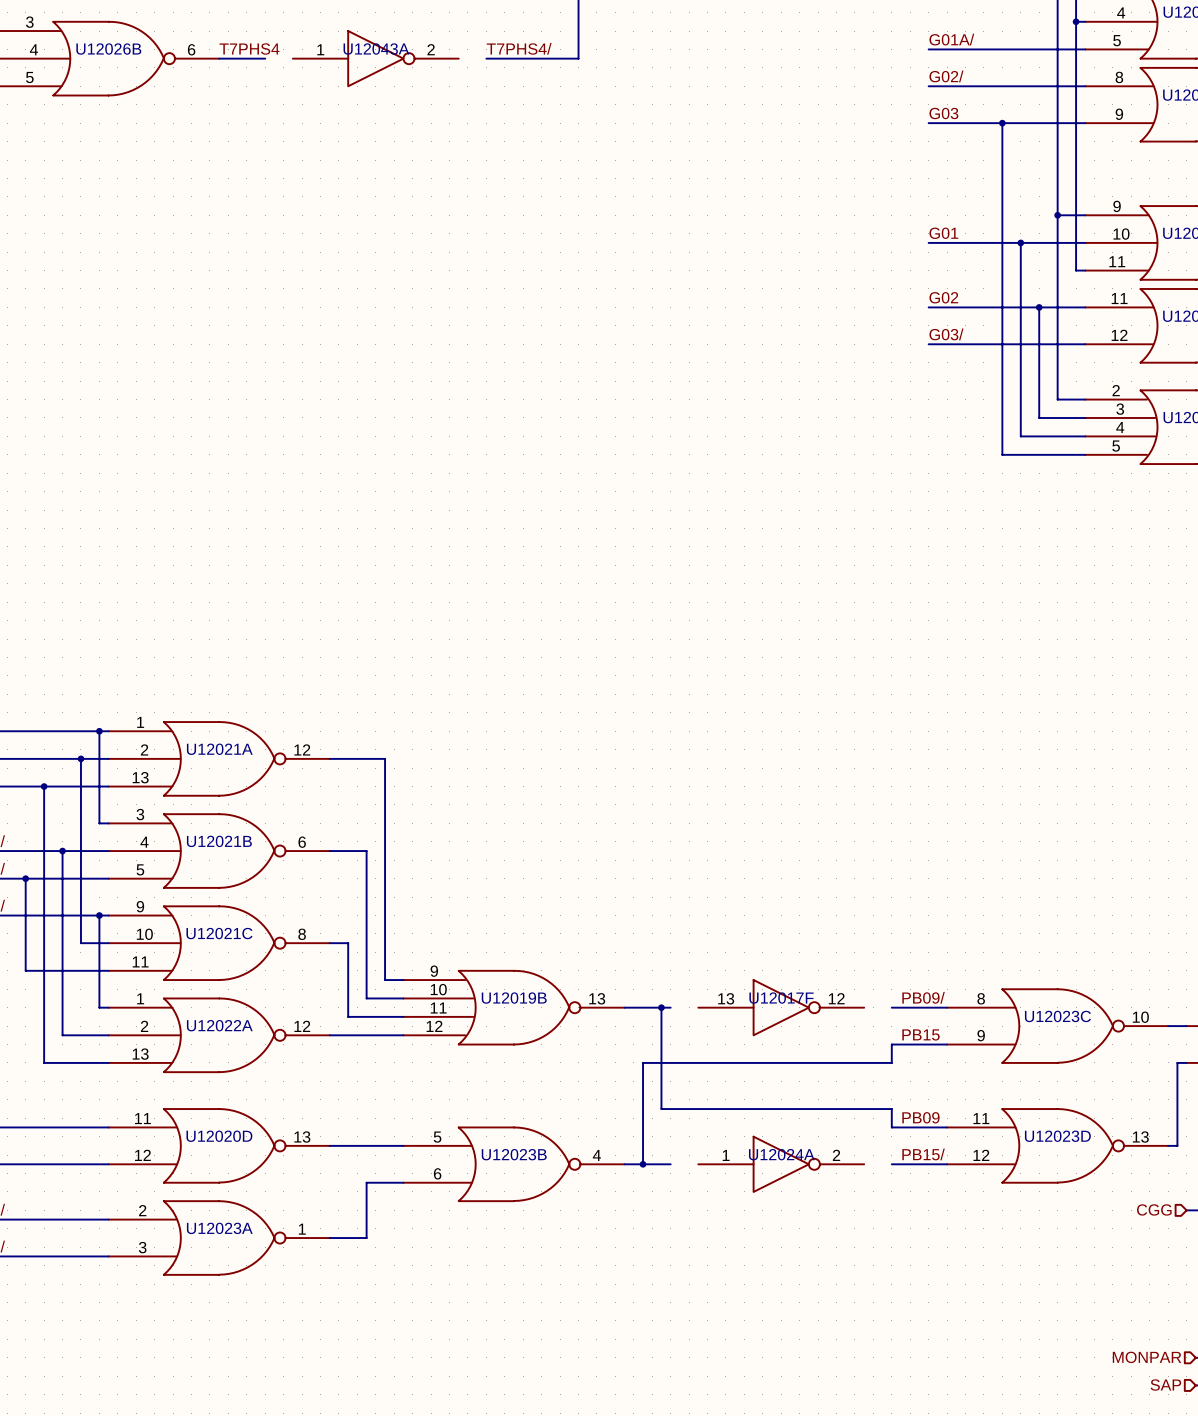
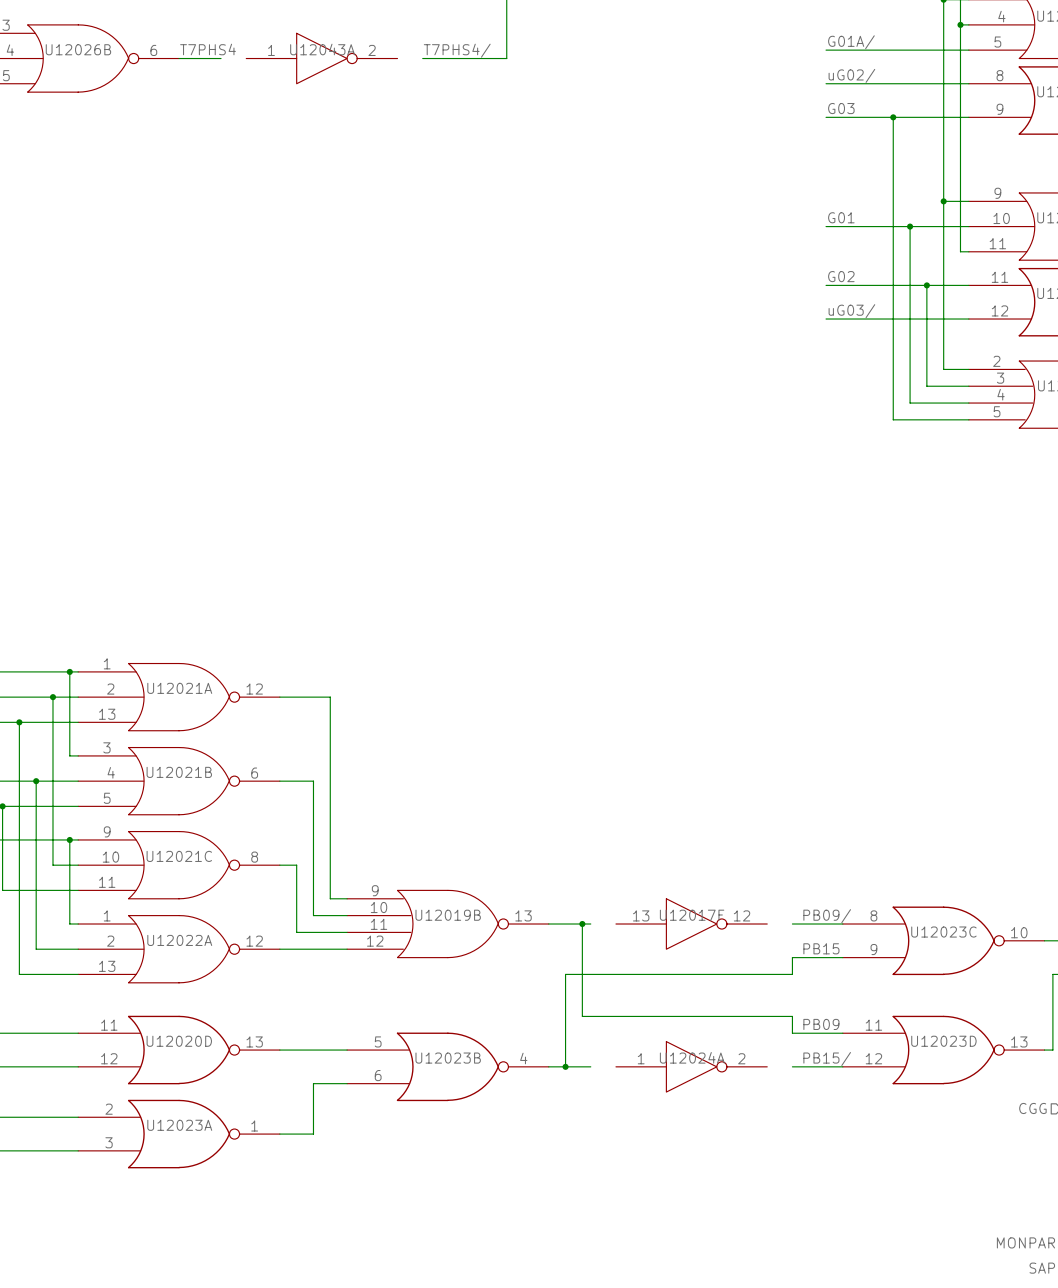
label: G02/ (946, 76) -> uG02/ (851, 75)
label: G03/ (946, 334) -> uG03/ (851, 311)

